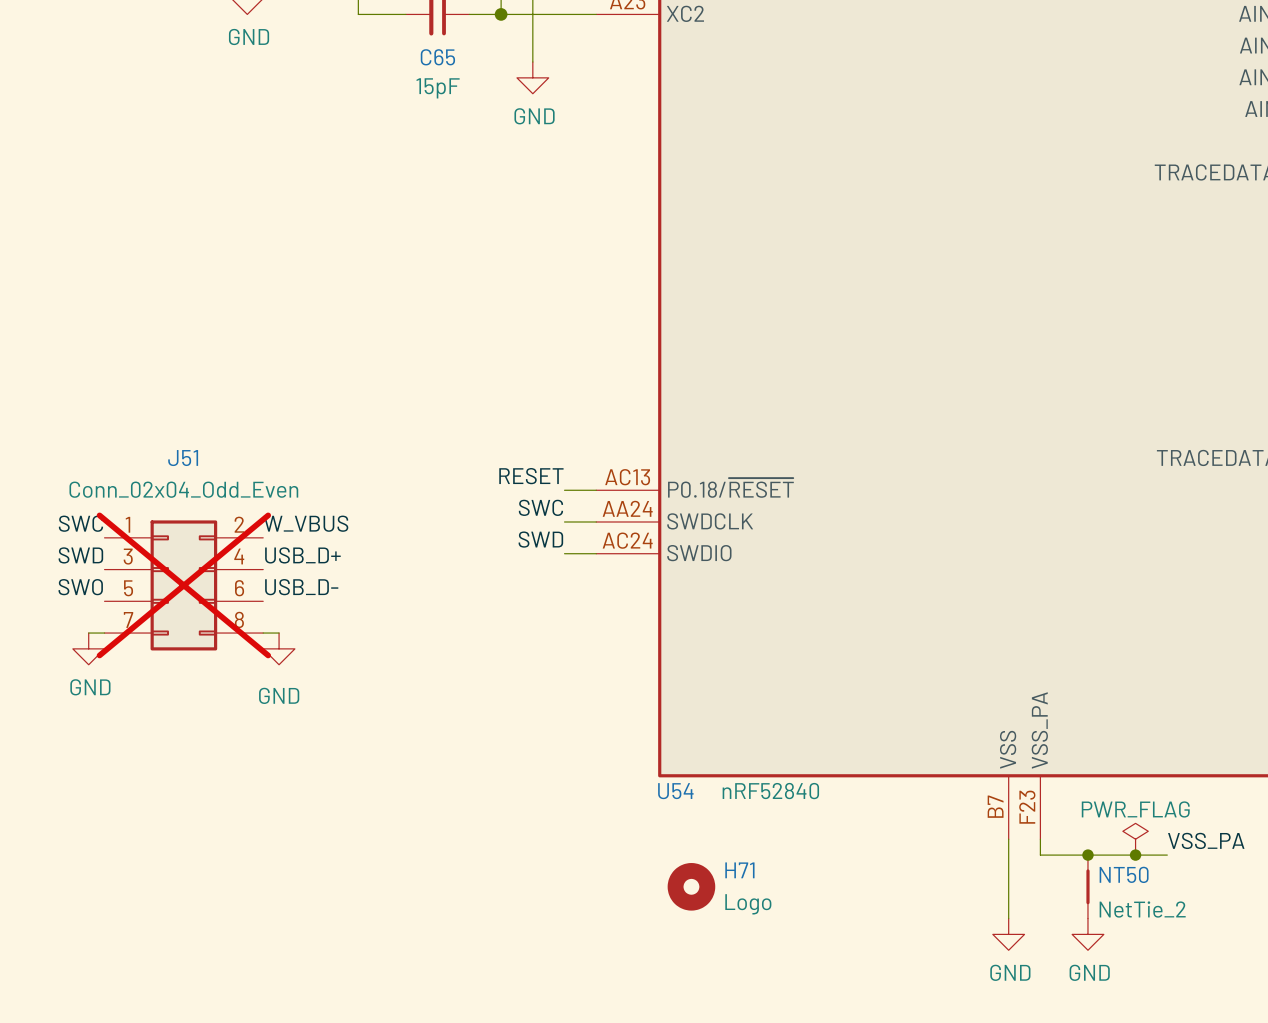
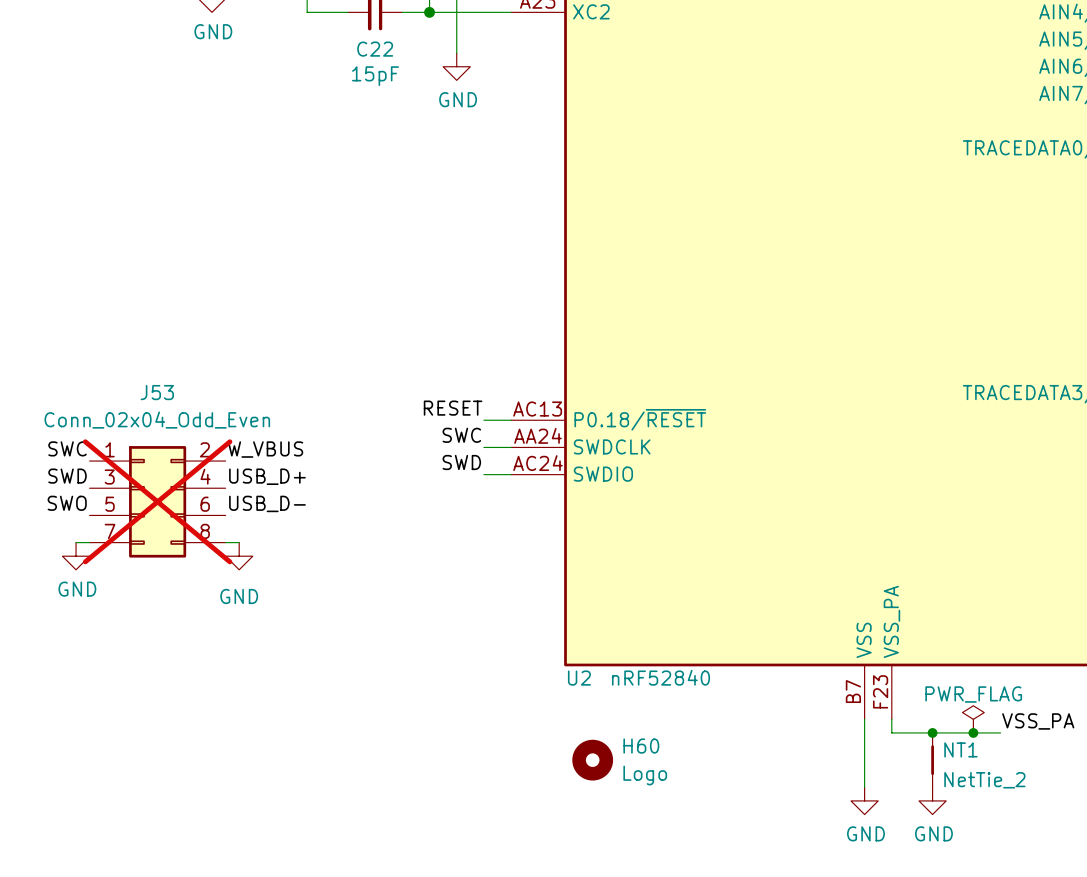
C65 name: C65 (437, 57) -> C22 (375, 49)
J51 name: J51 (183, 458) -> J53 (157, 392)
U54 name: U54 (675, 791) -> U2 (579, 678)
H71 name: H71 (739, 870) -> H60 (641, 746)
NT50 name: NT50 (1124, 874) -> NT1 (960, 749)

